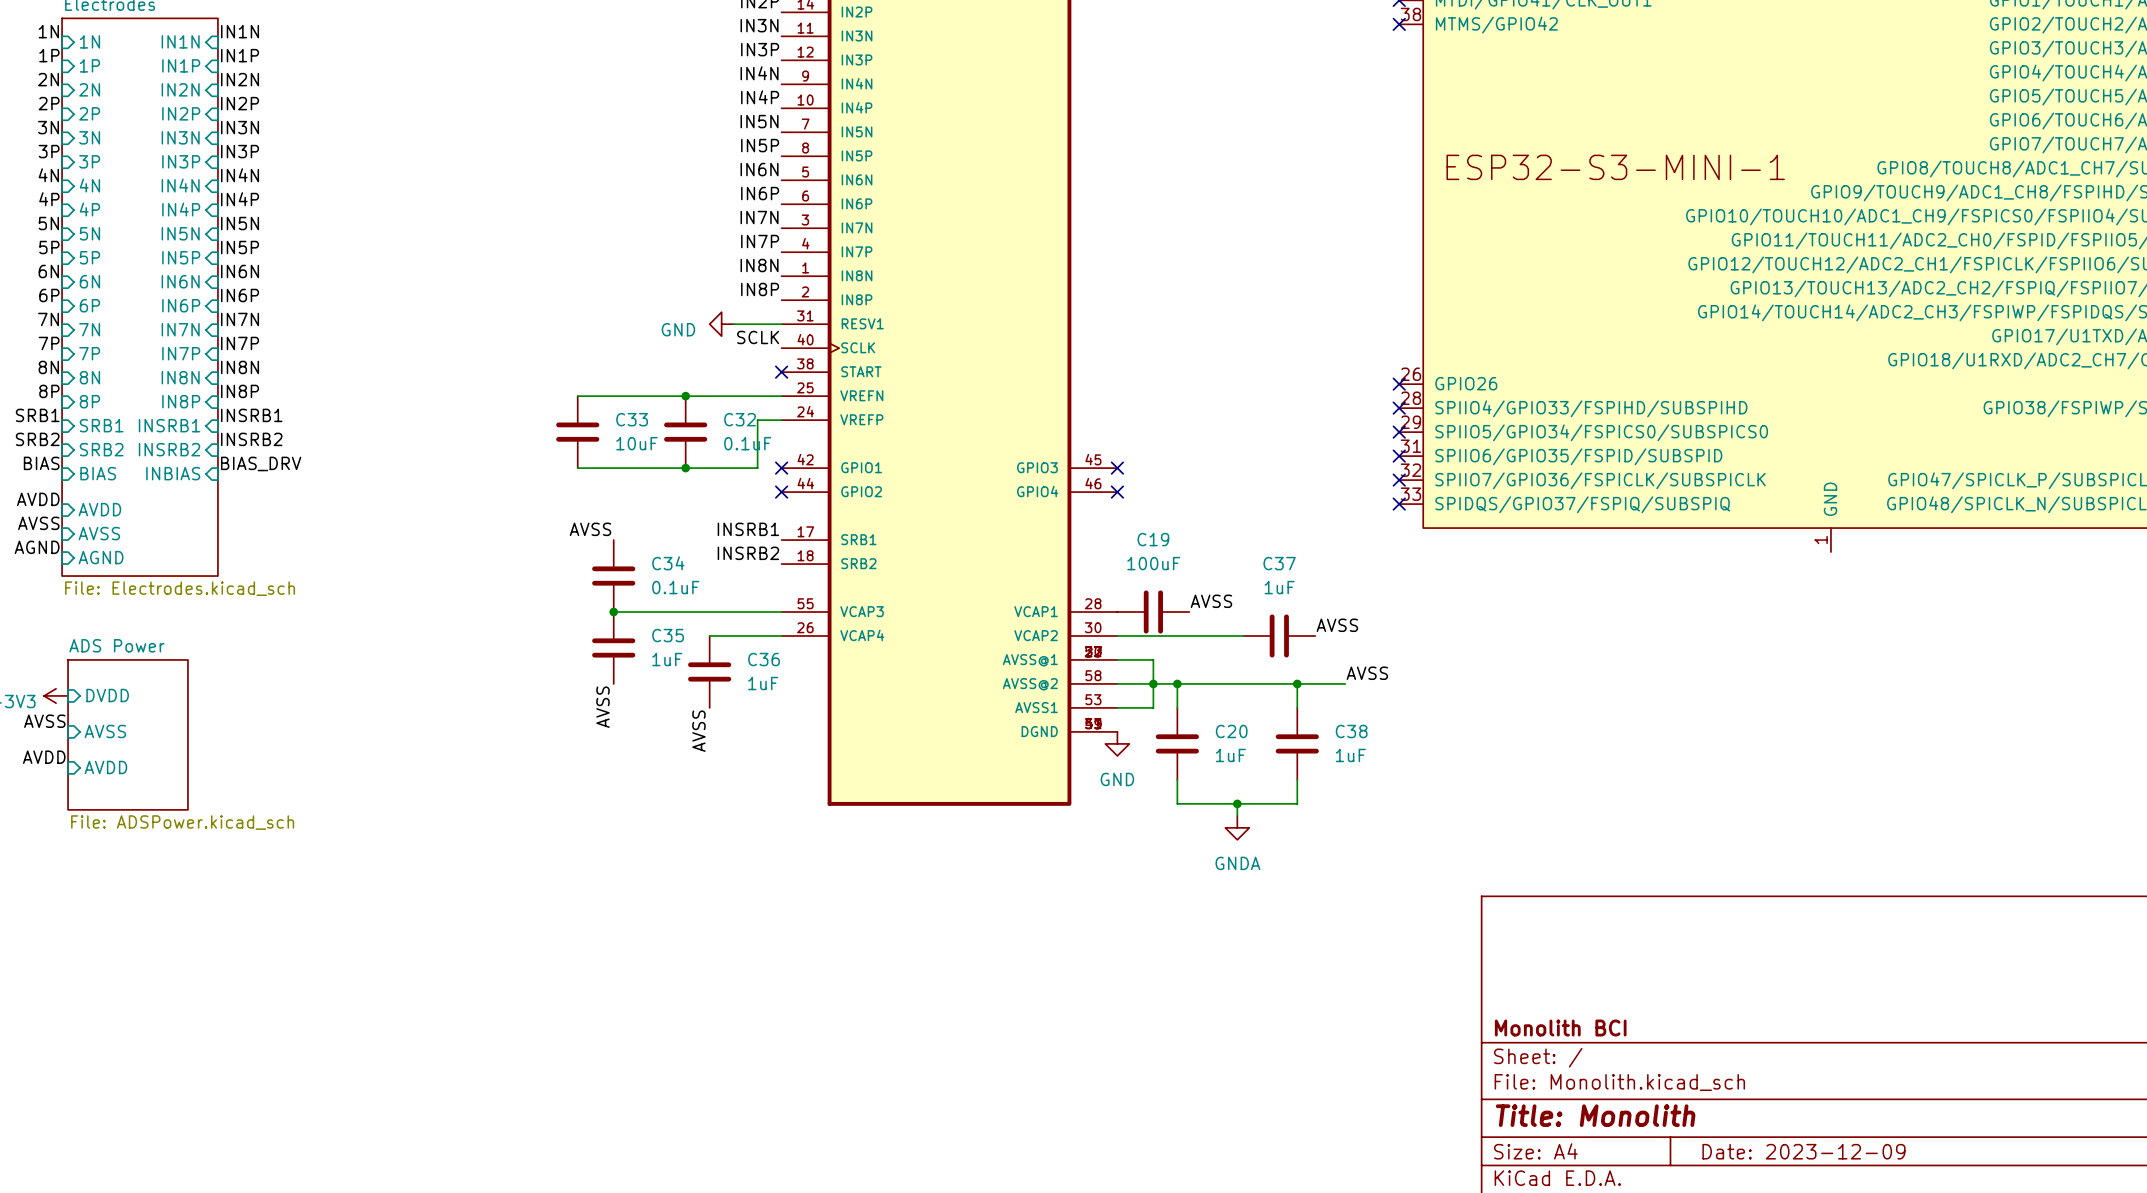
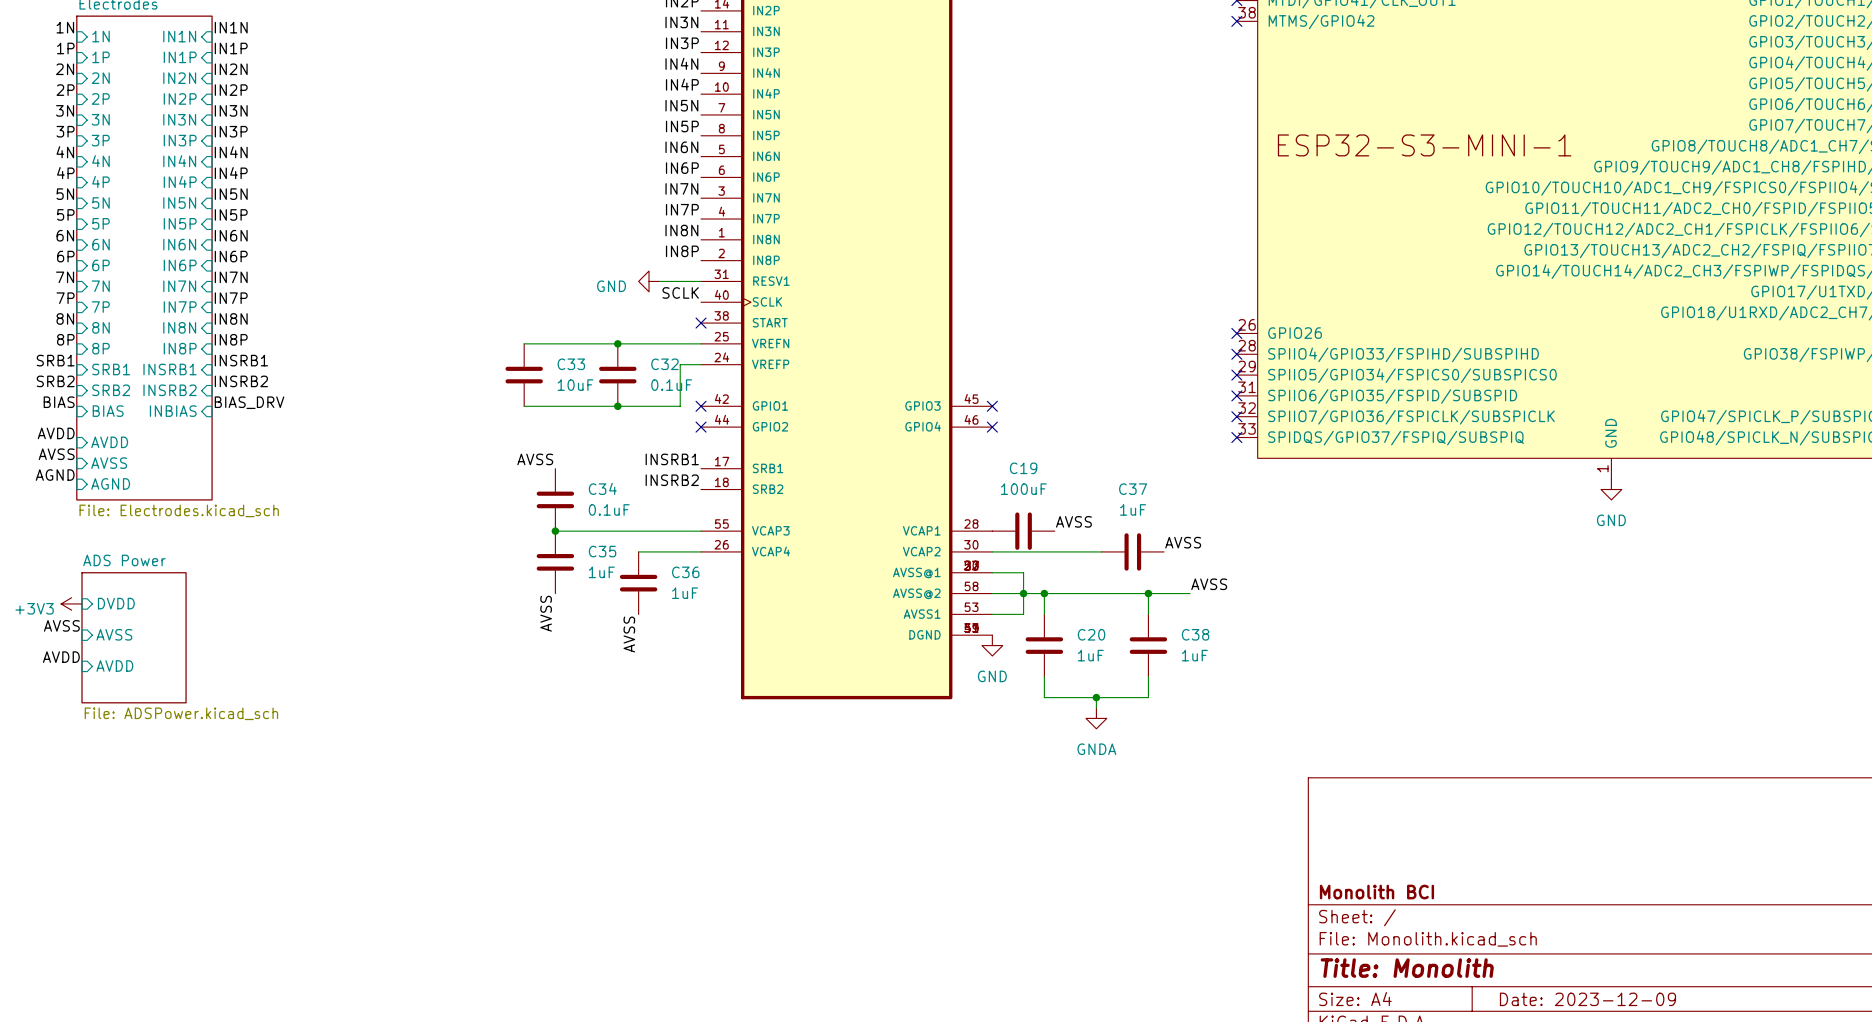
power symbol: none -> GND (1611, 489)

